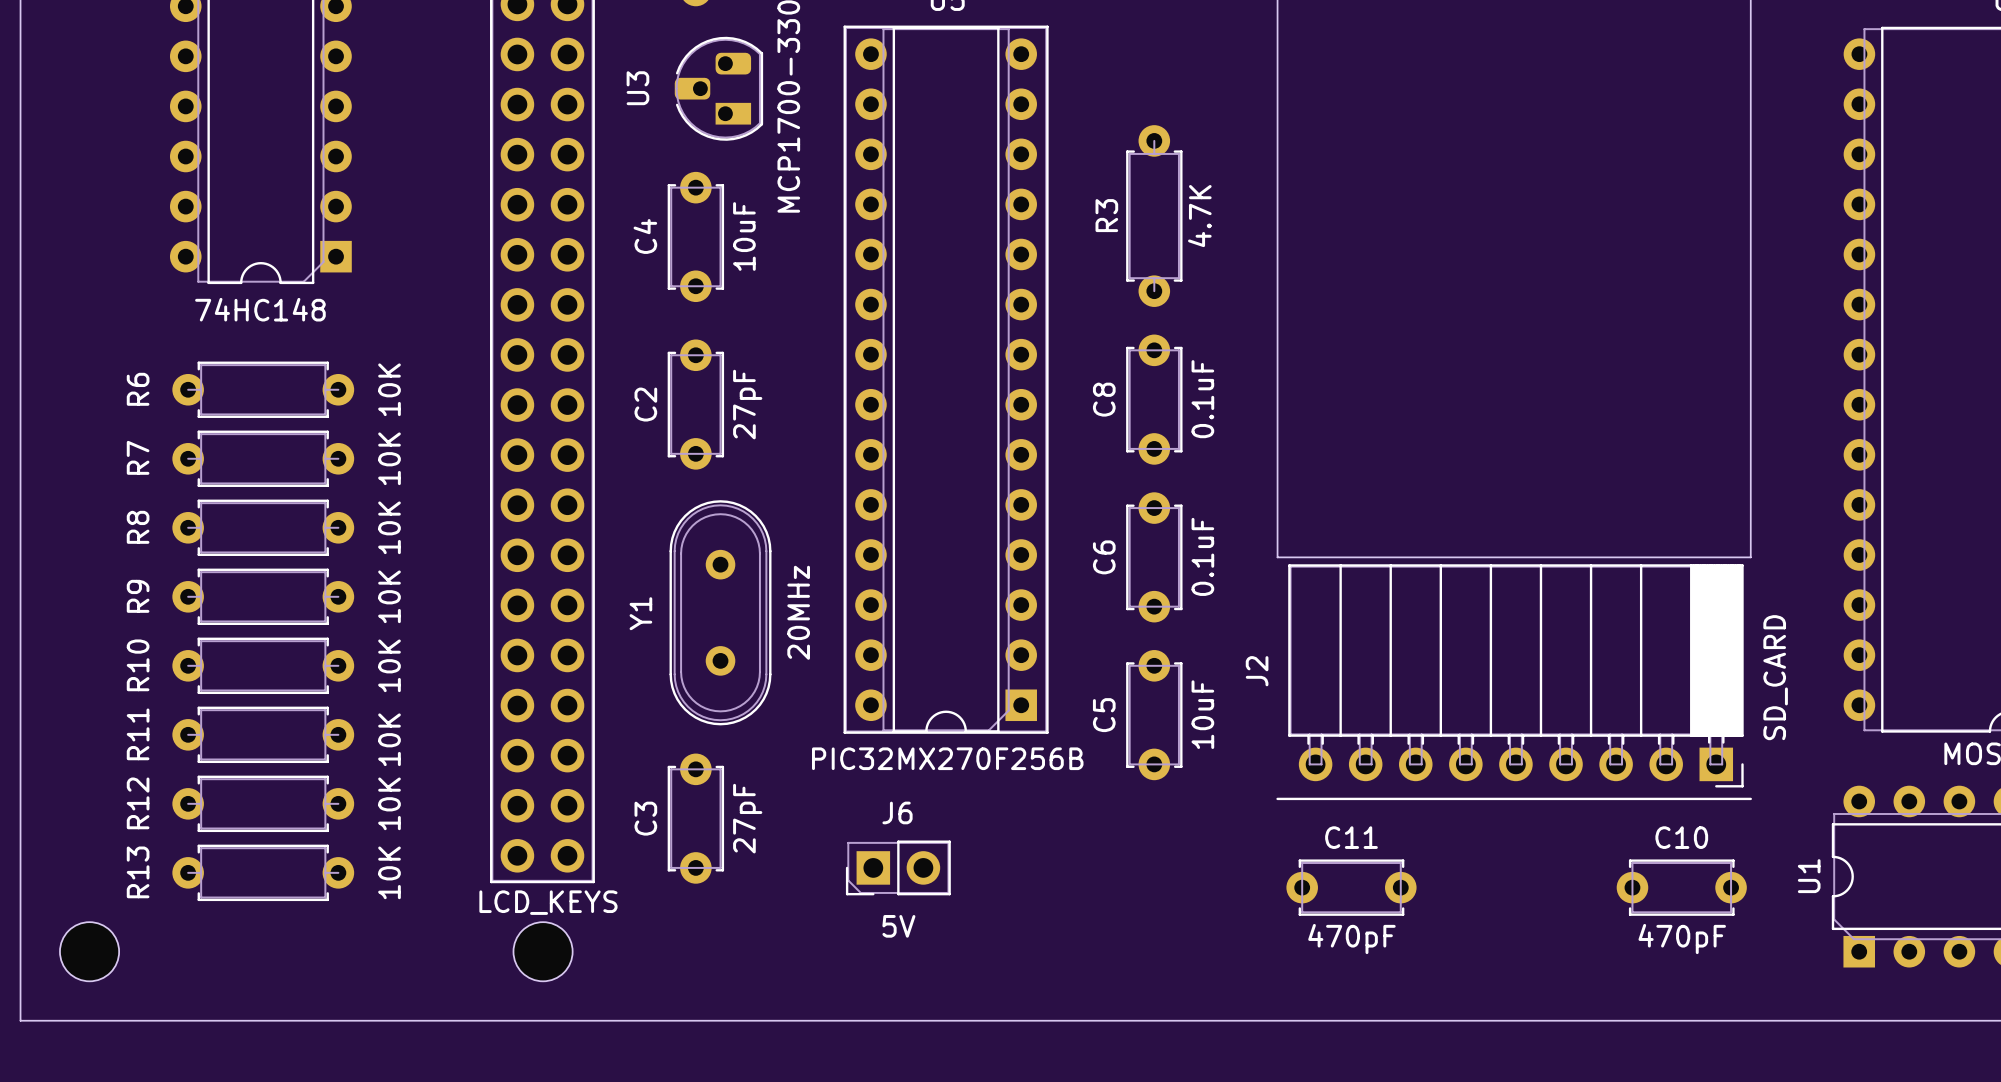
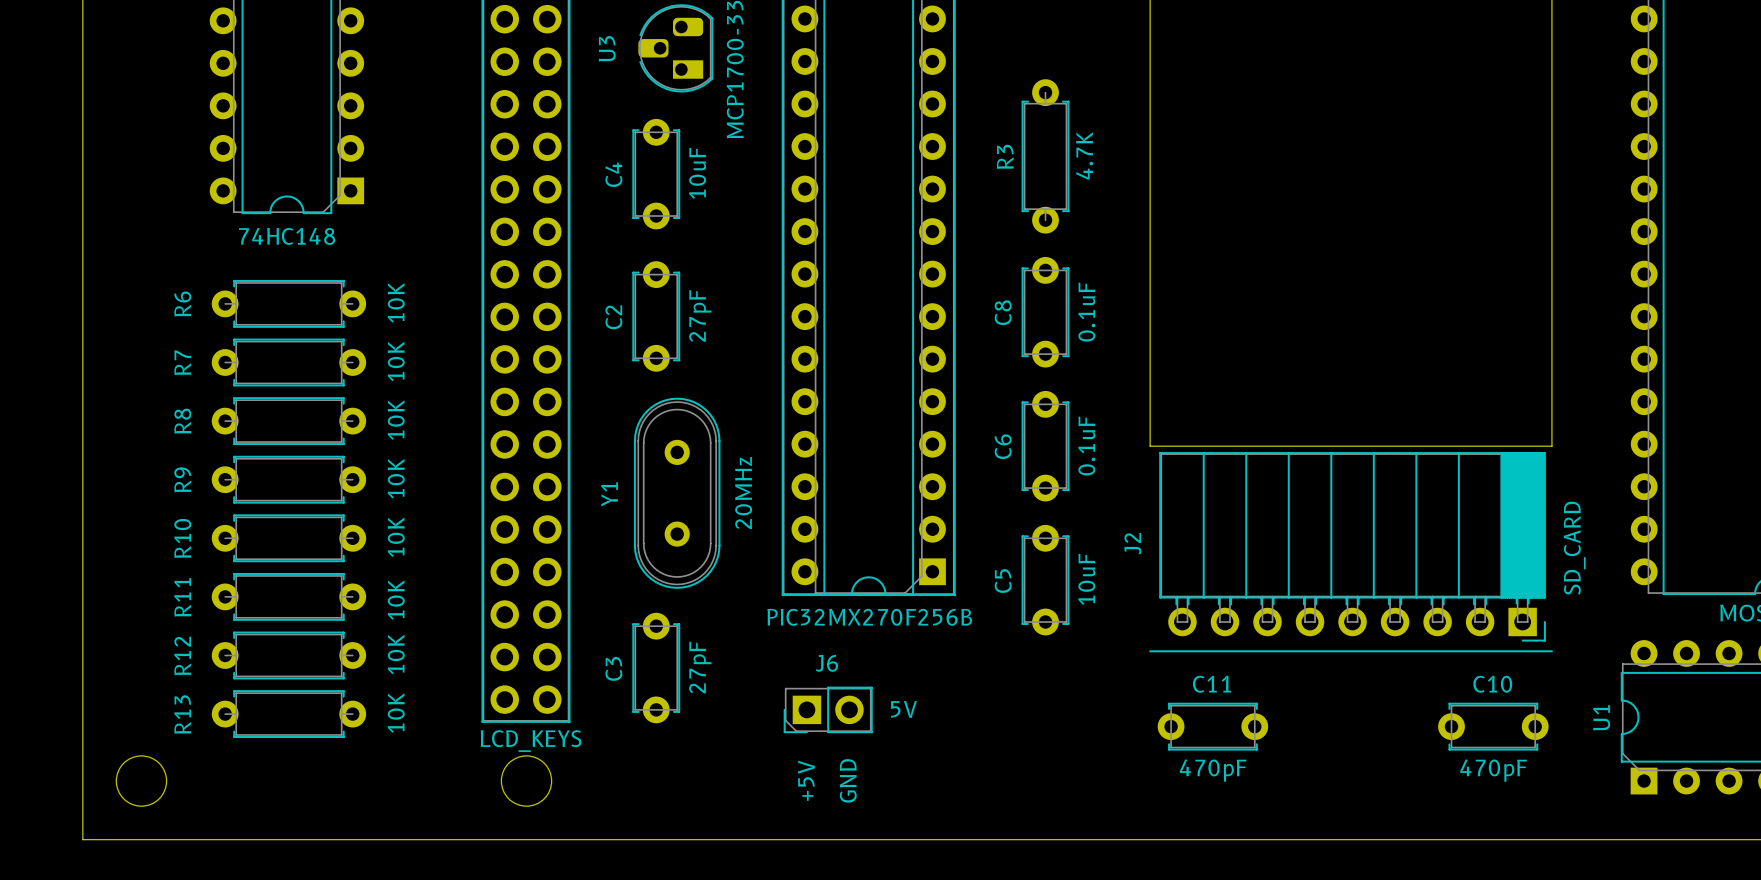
J6 value position: 5V (898, 926) -> 5V (903, 709)
text: none -> +5V (806, 780)
text: none -> GND (848, 780)

